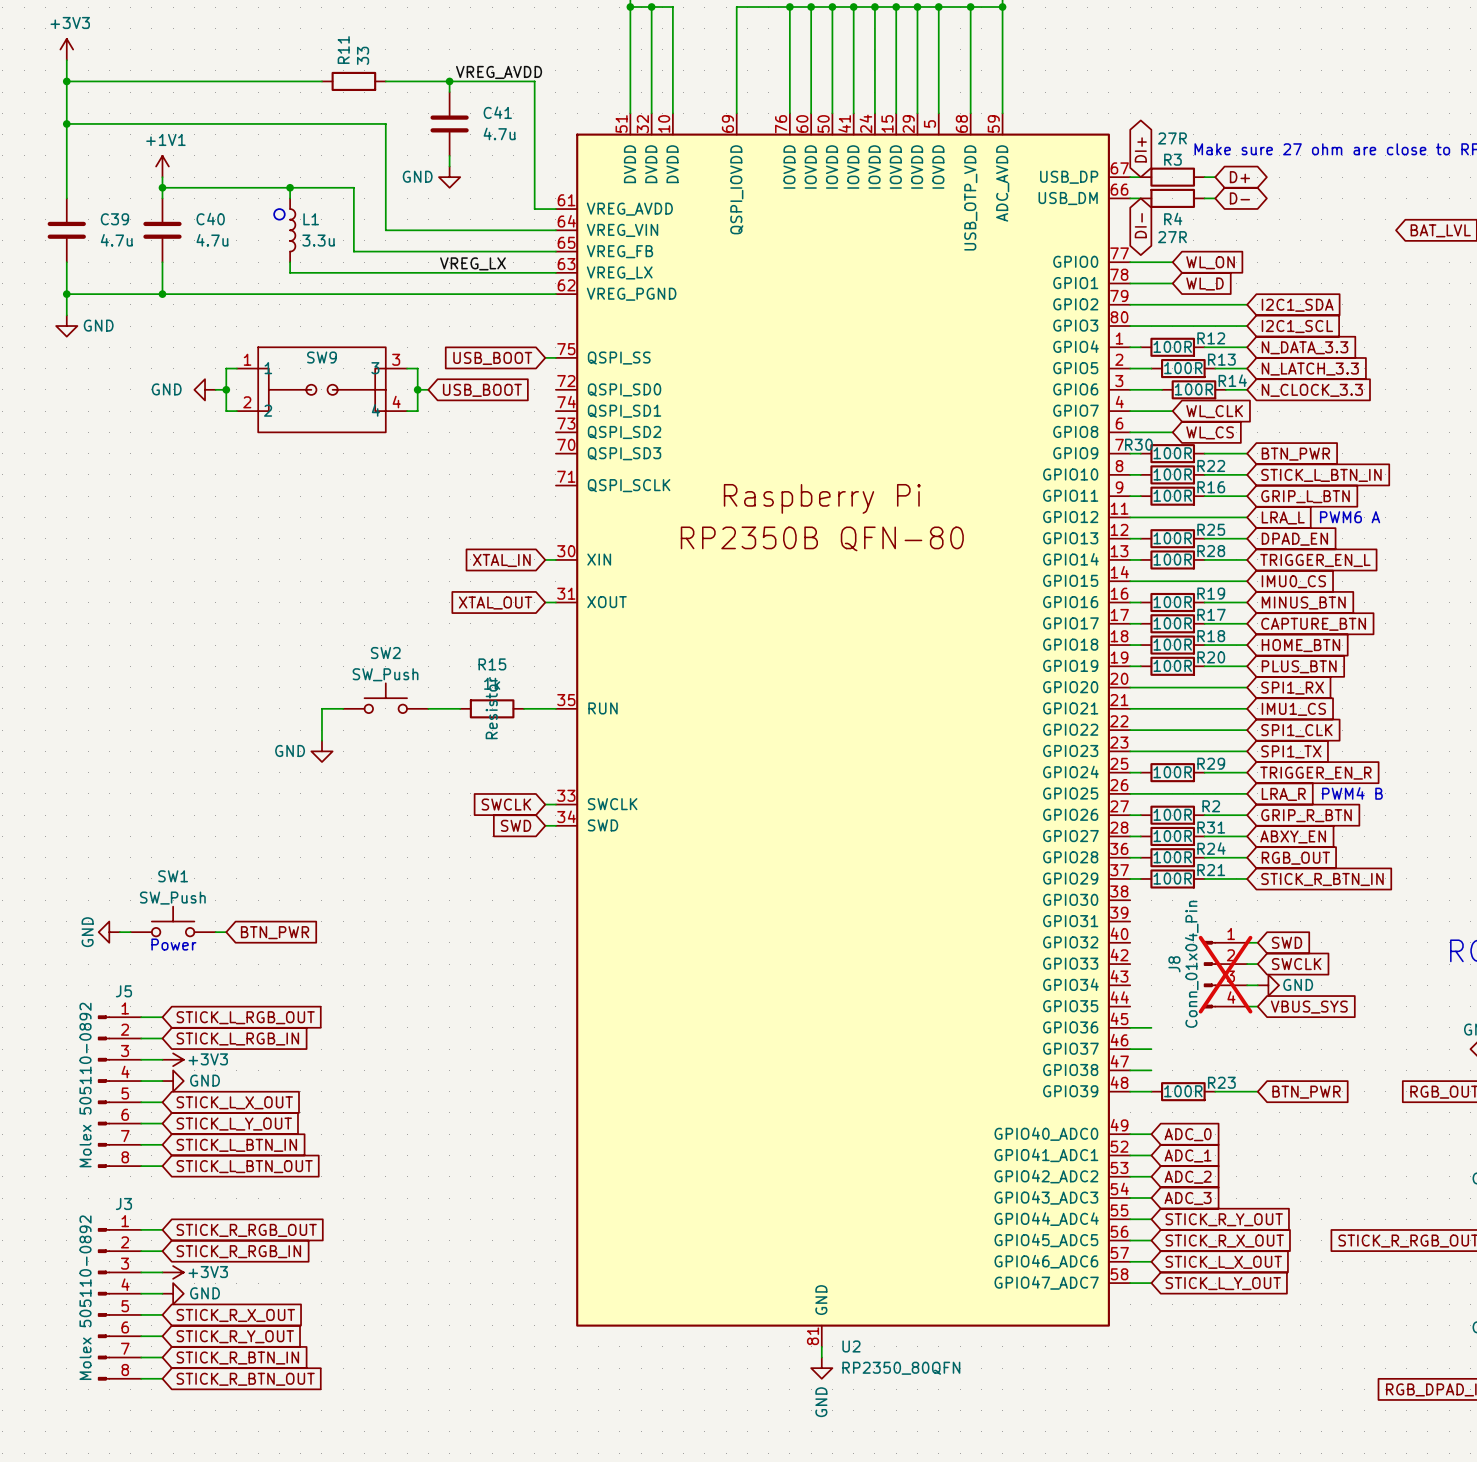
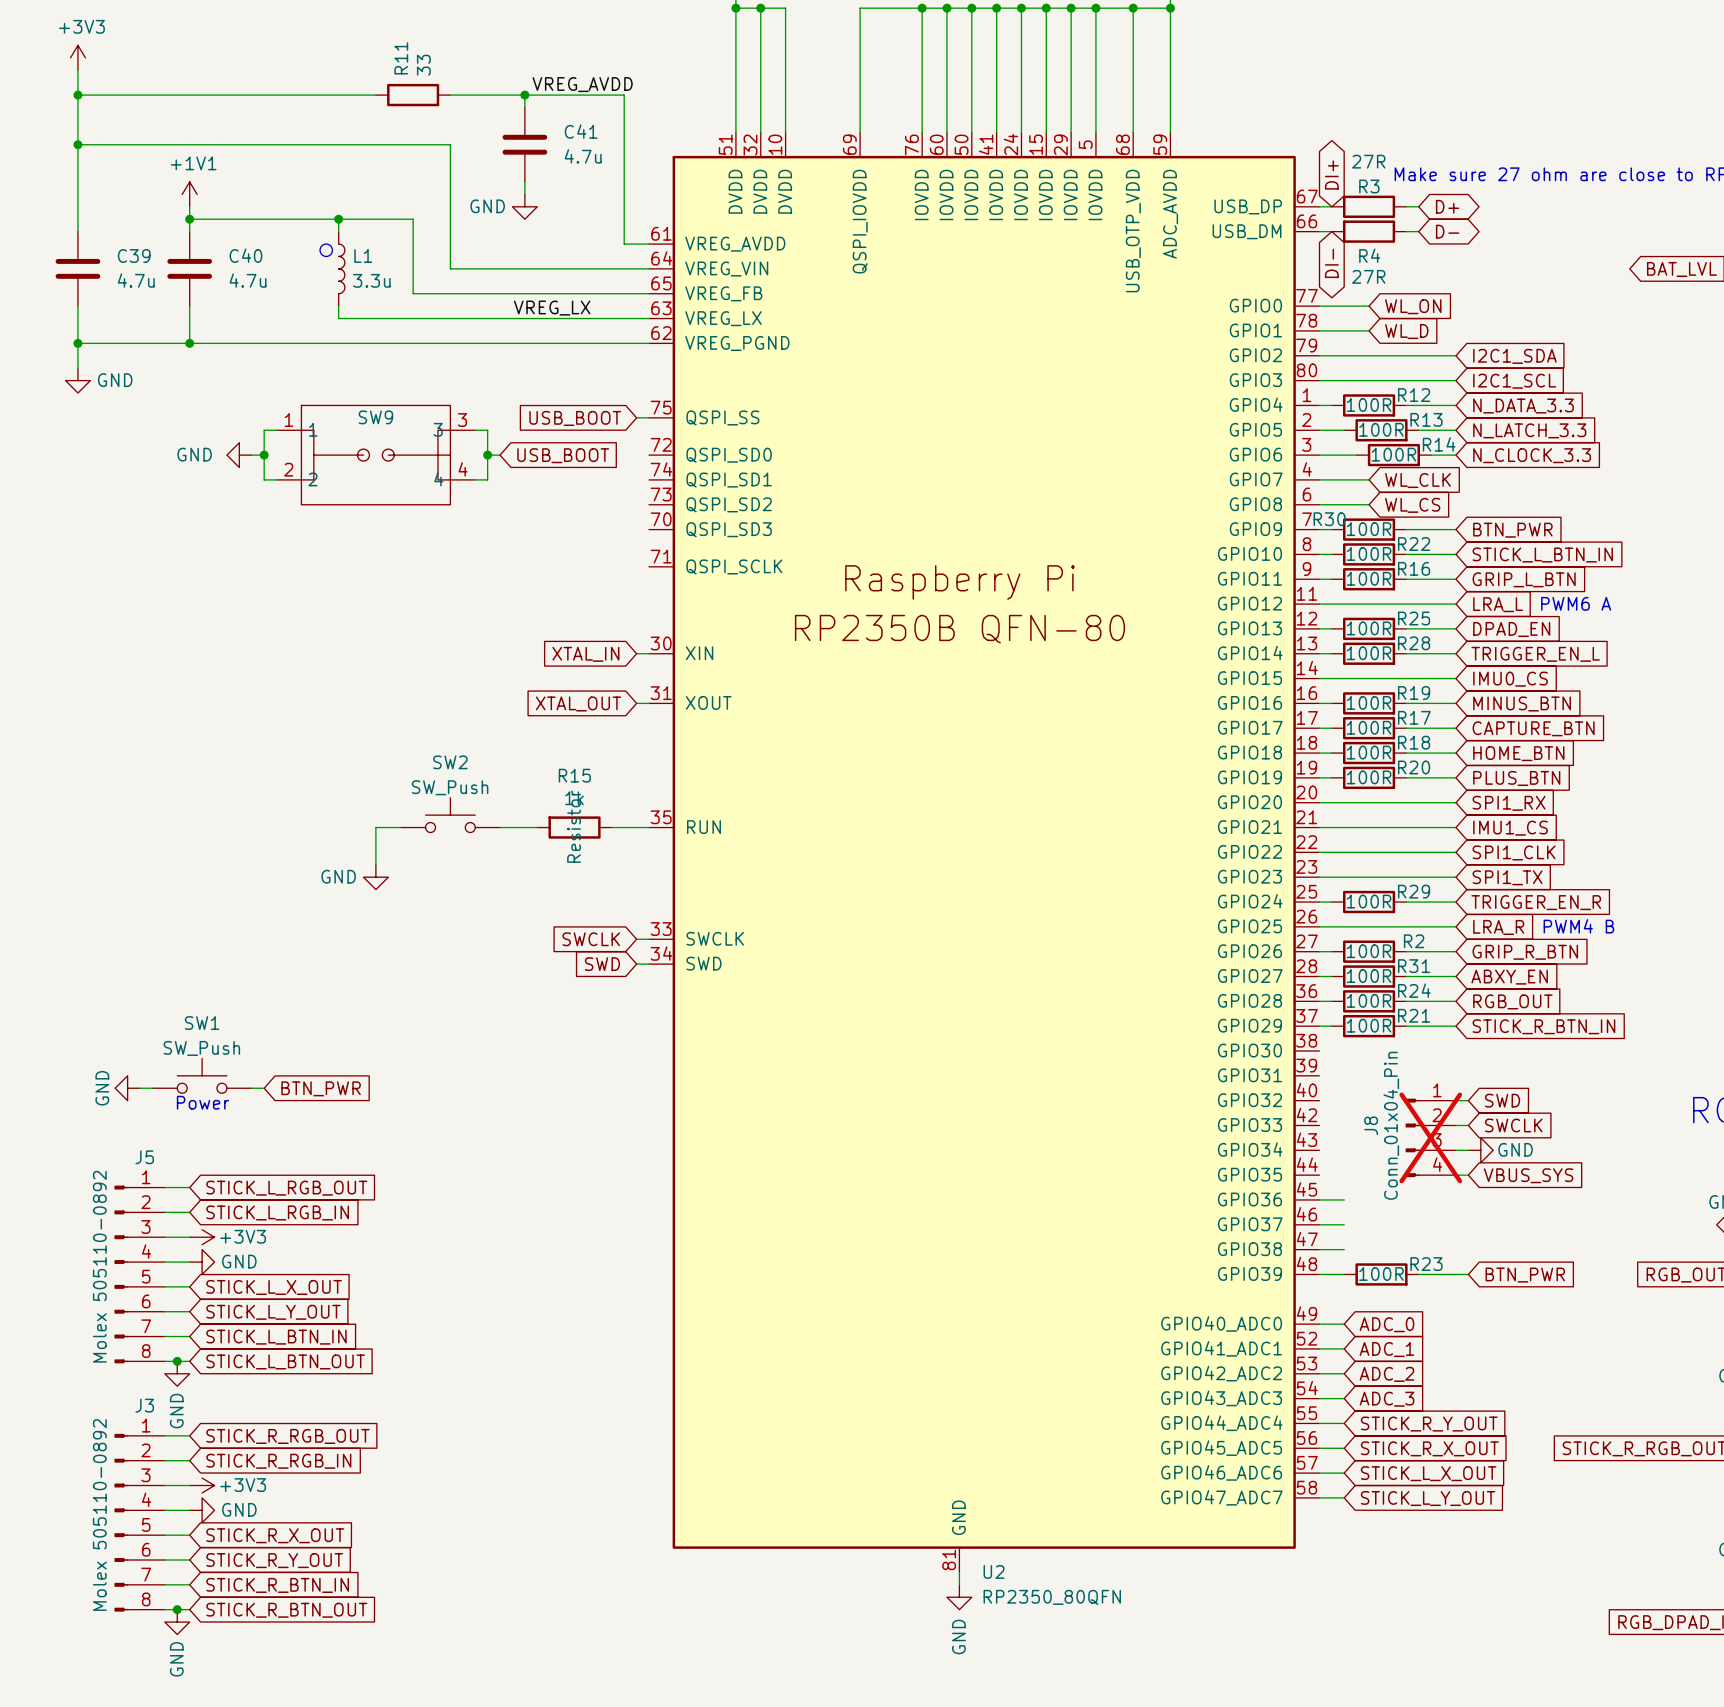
junction: none -> (177, 1361)
power symbol: none -> GND (177, 1373)
junction: none -> (177, 1609)
power symbol: none -> GND (177, 1622)

